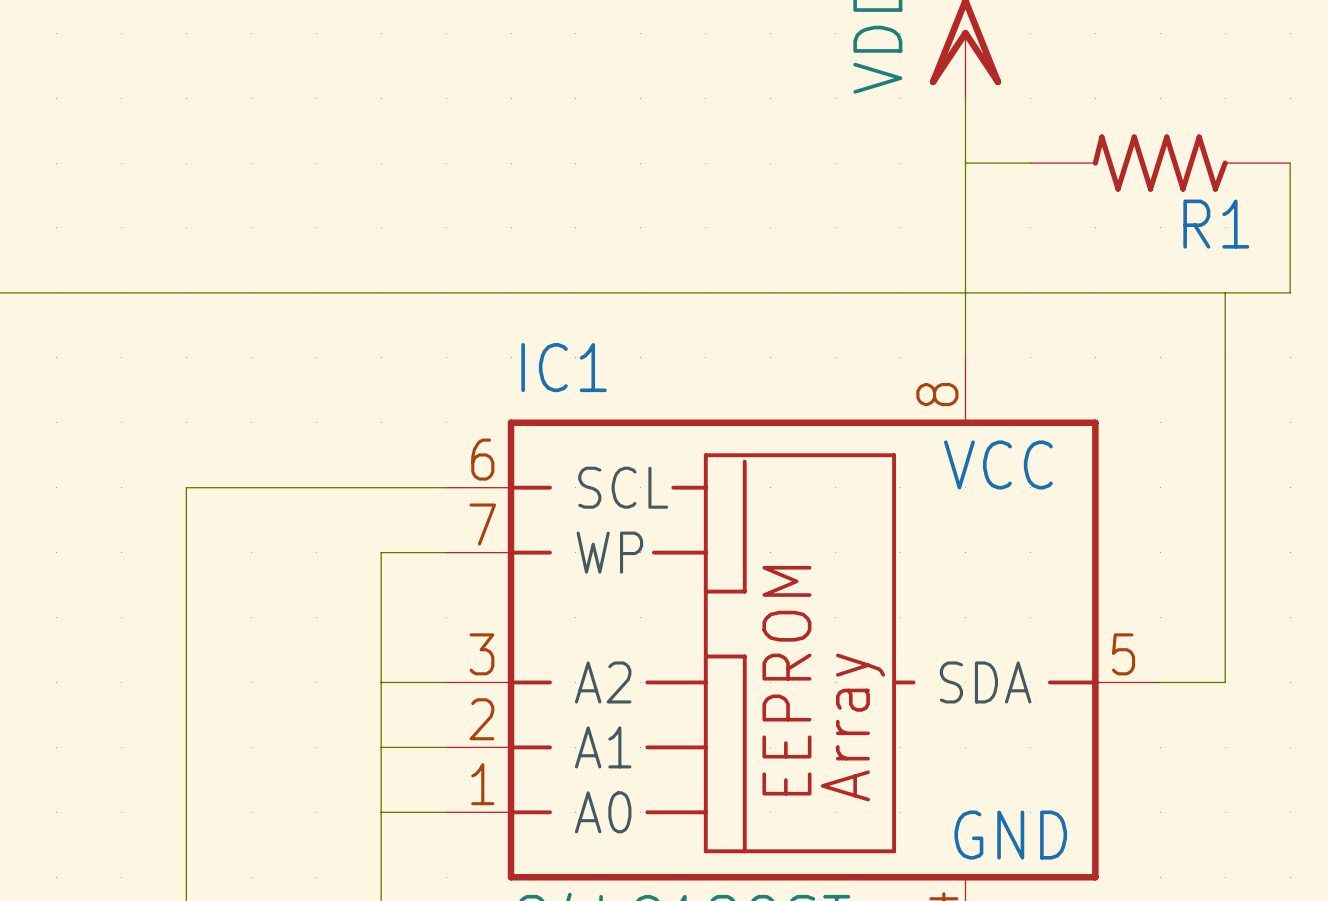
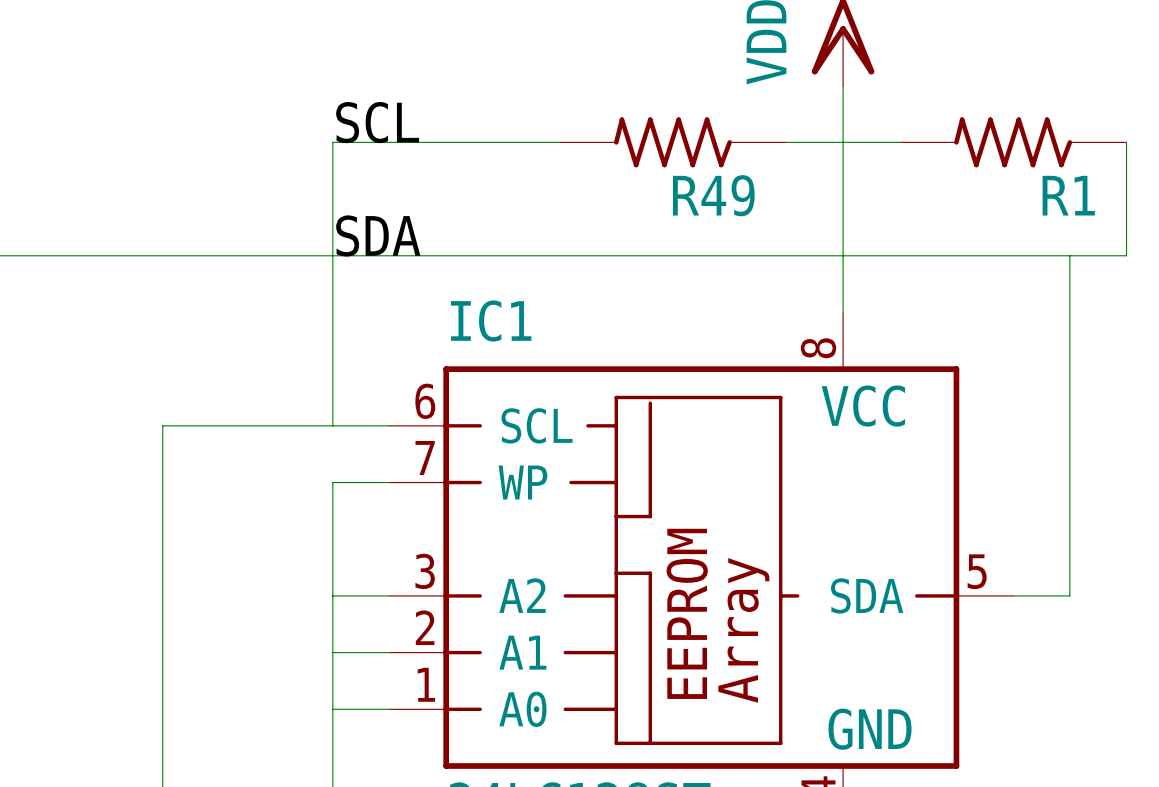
label: none -> SCL (377, 122)
wire: none -> (559, 142) (332, 142) (332, 425)
R49: none -> (672, 142)
wire: none -> (786, 142) (843, 142)
label: none -> SDA (378, 235)

